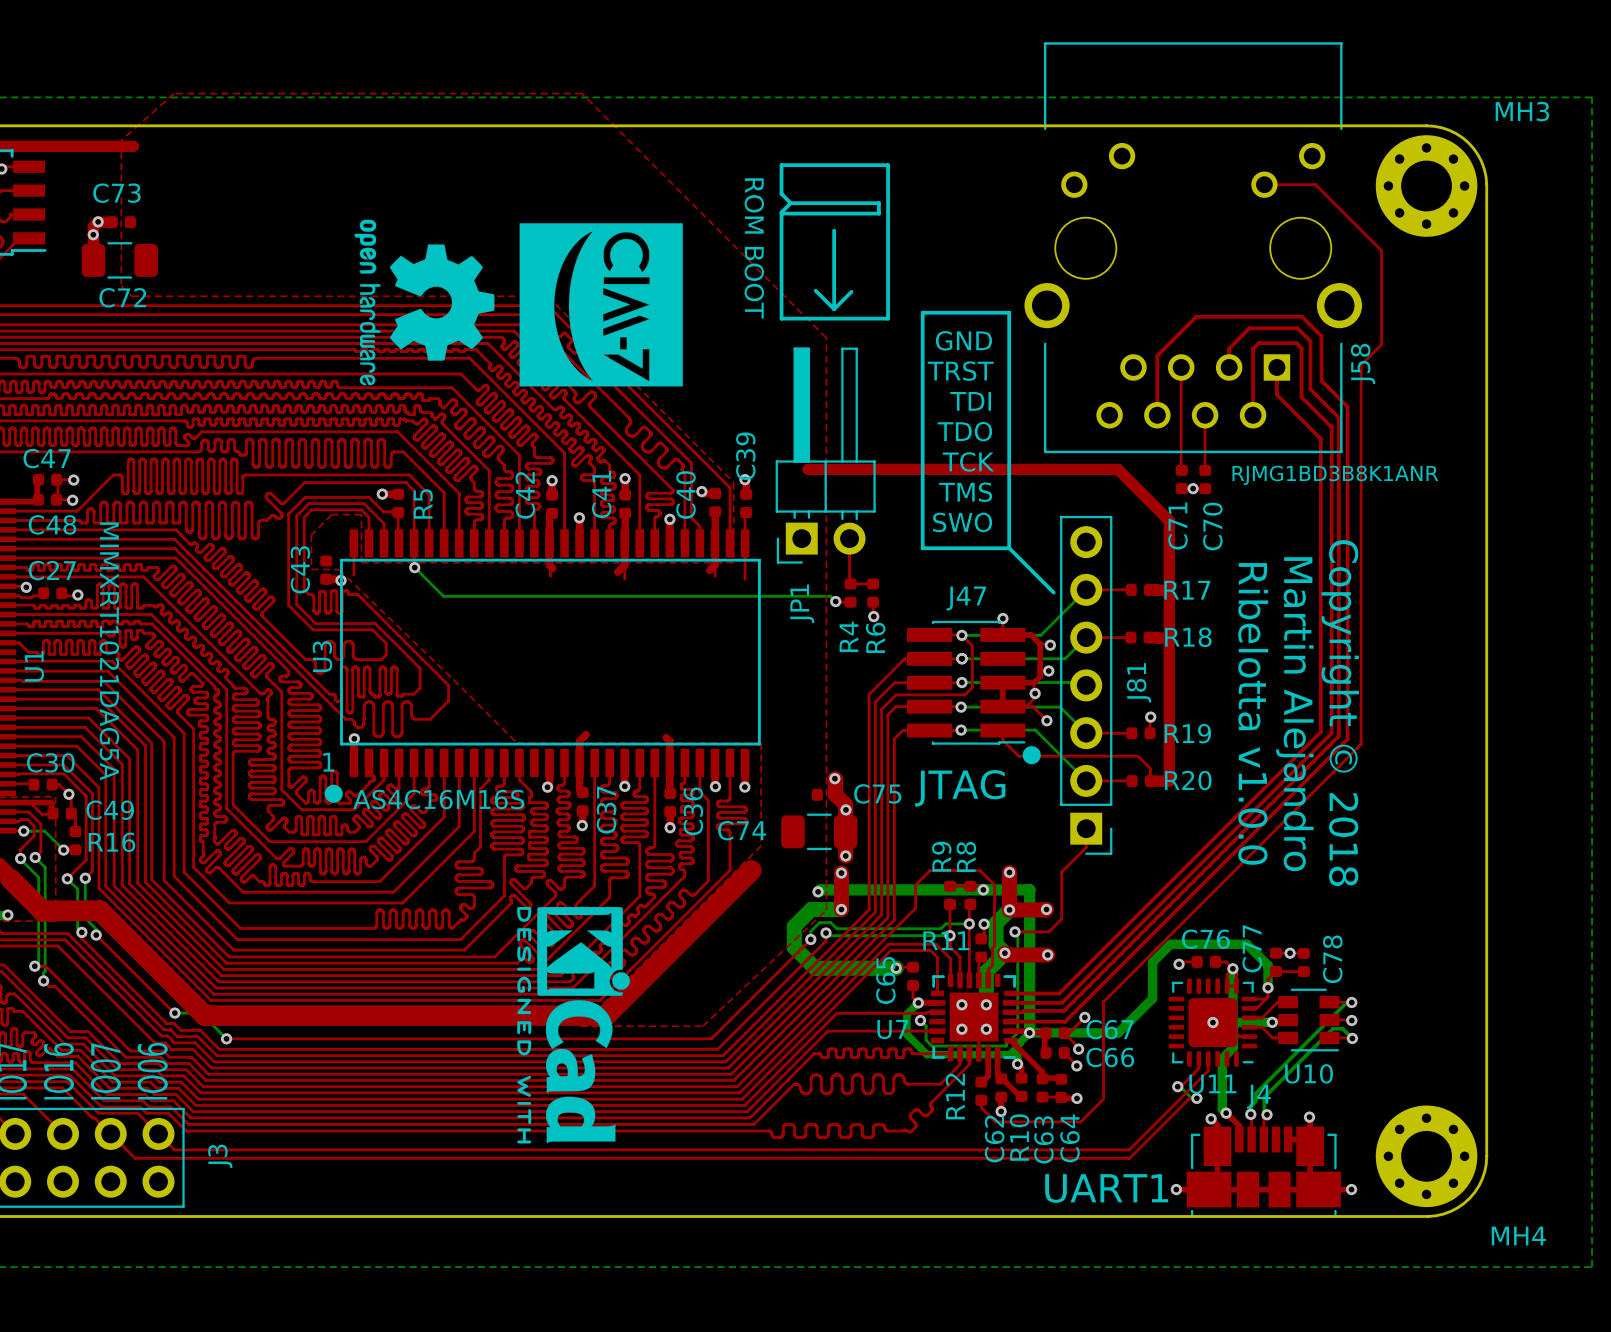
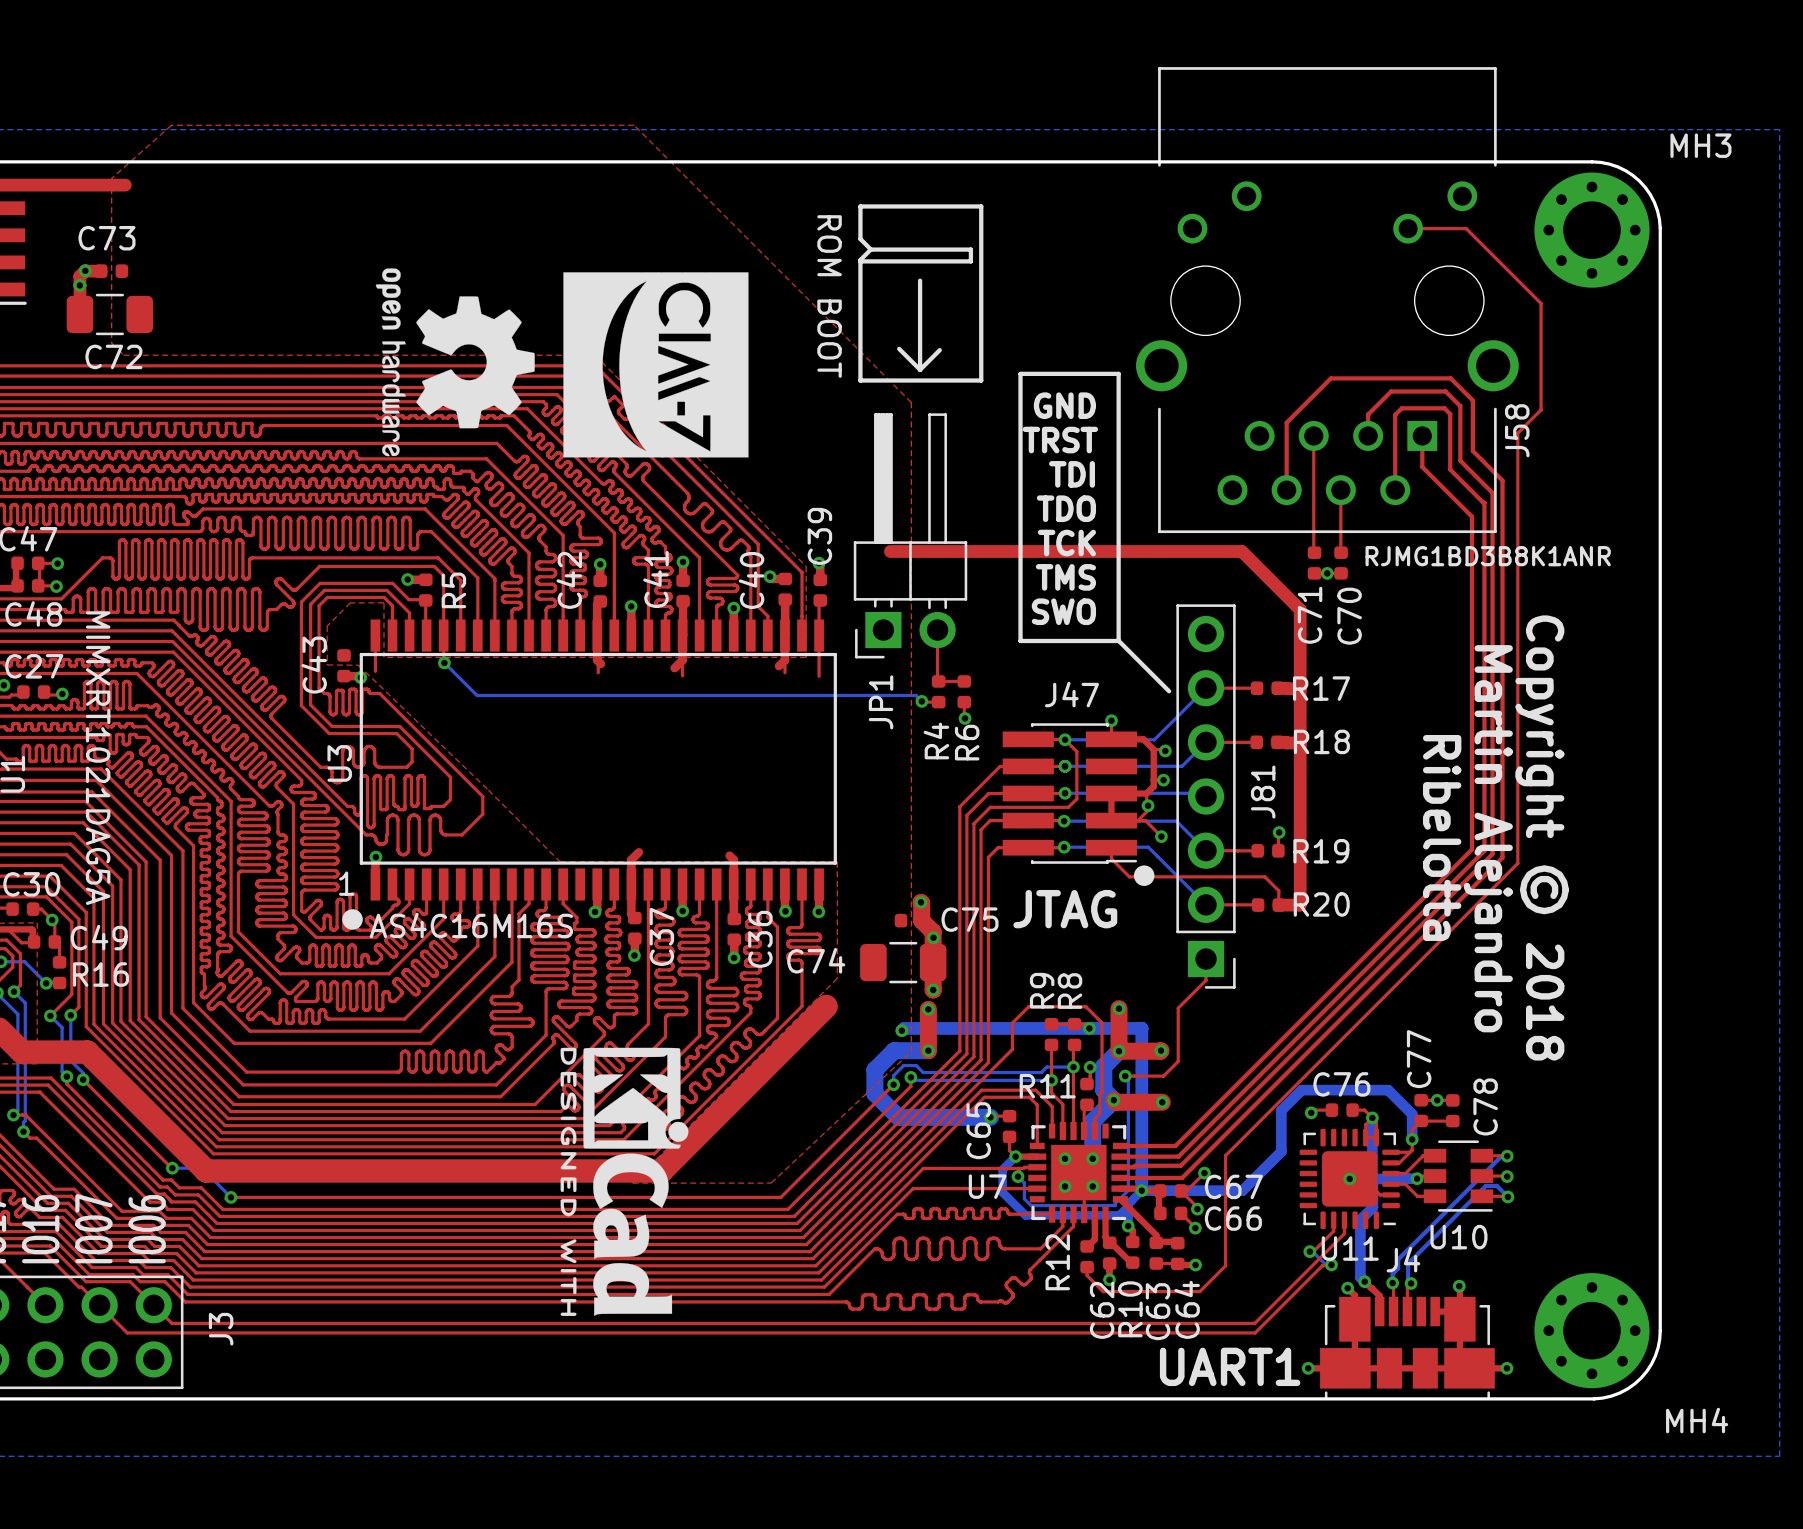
text: Ribelotta v1.0.0 (1253, 713) -> none
text: Copyright © 2018 (1340, 713) -> Martin Alejandro (1488, 838)
text: Martin Alejandro (1294, 714) -> Ribelotta (1442, 837)
text: none -> Copyright © 2018 (1542, 837)
C77 name position: C77 (1252, 948) -> C77 (1419, 1059)

